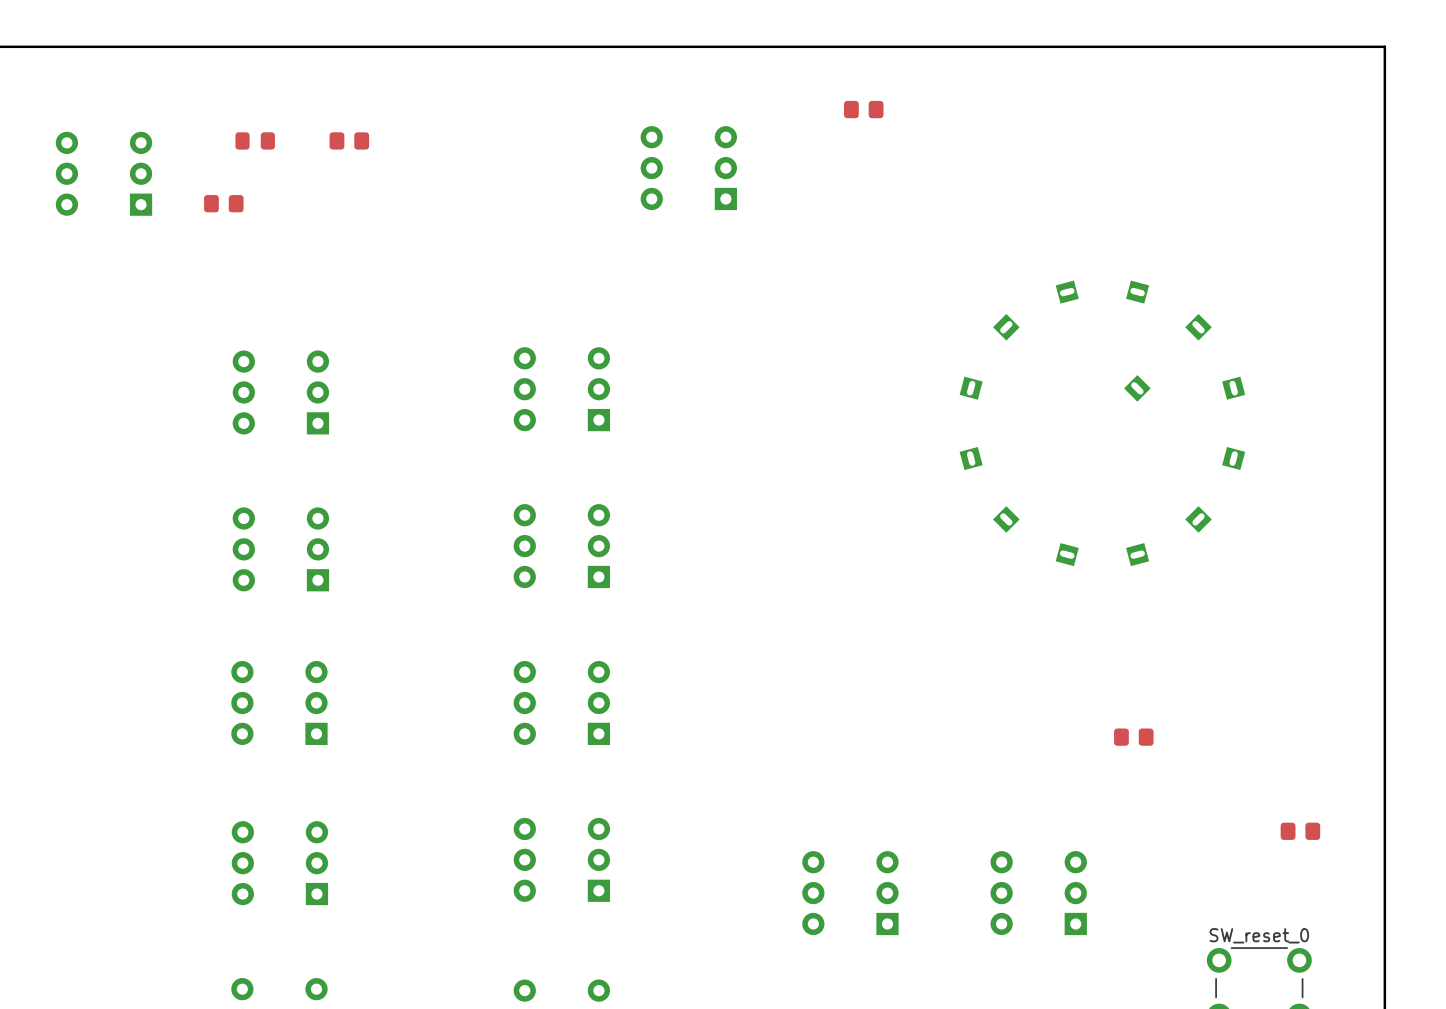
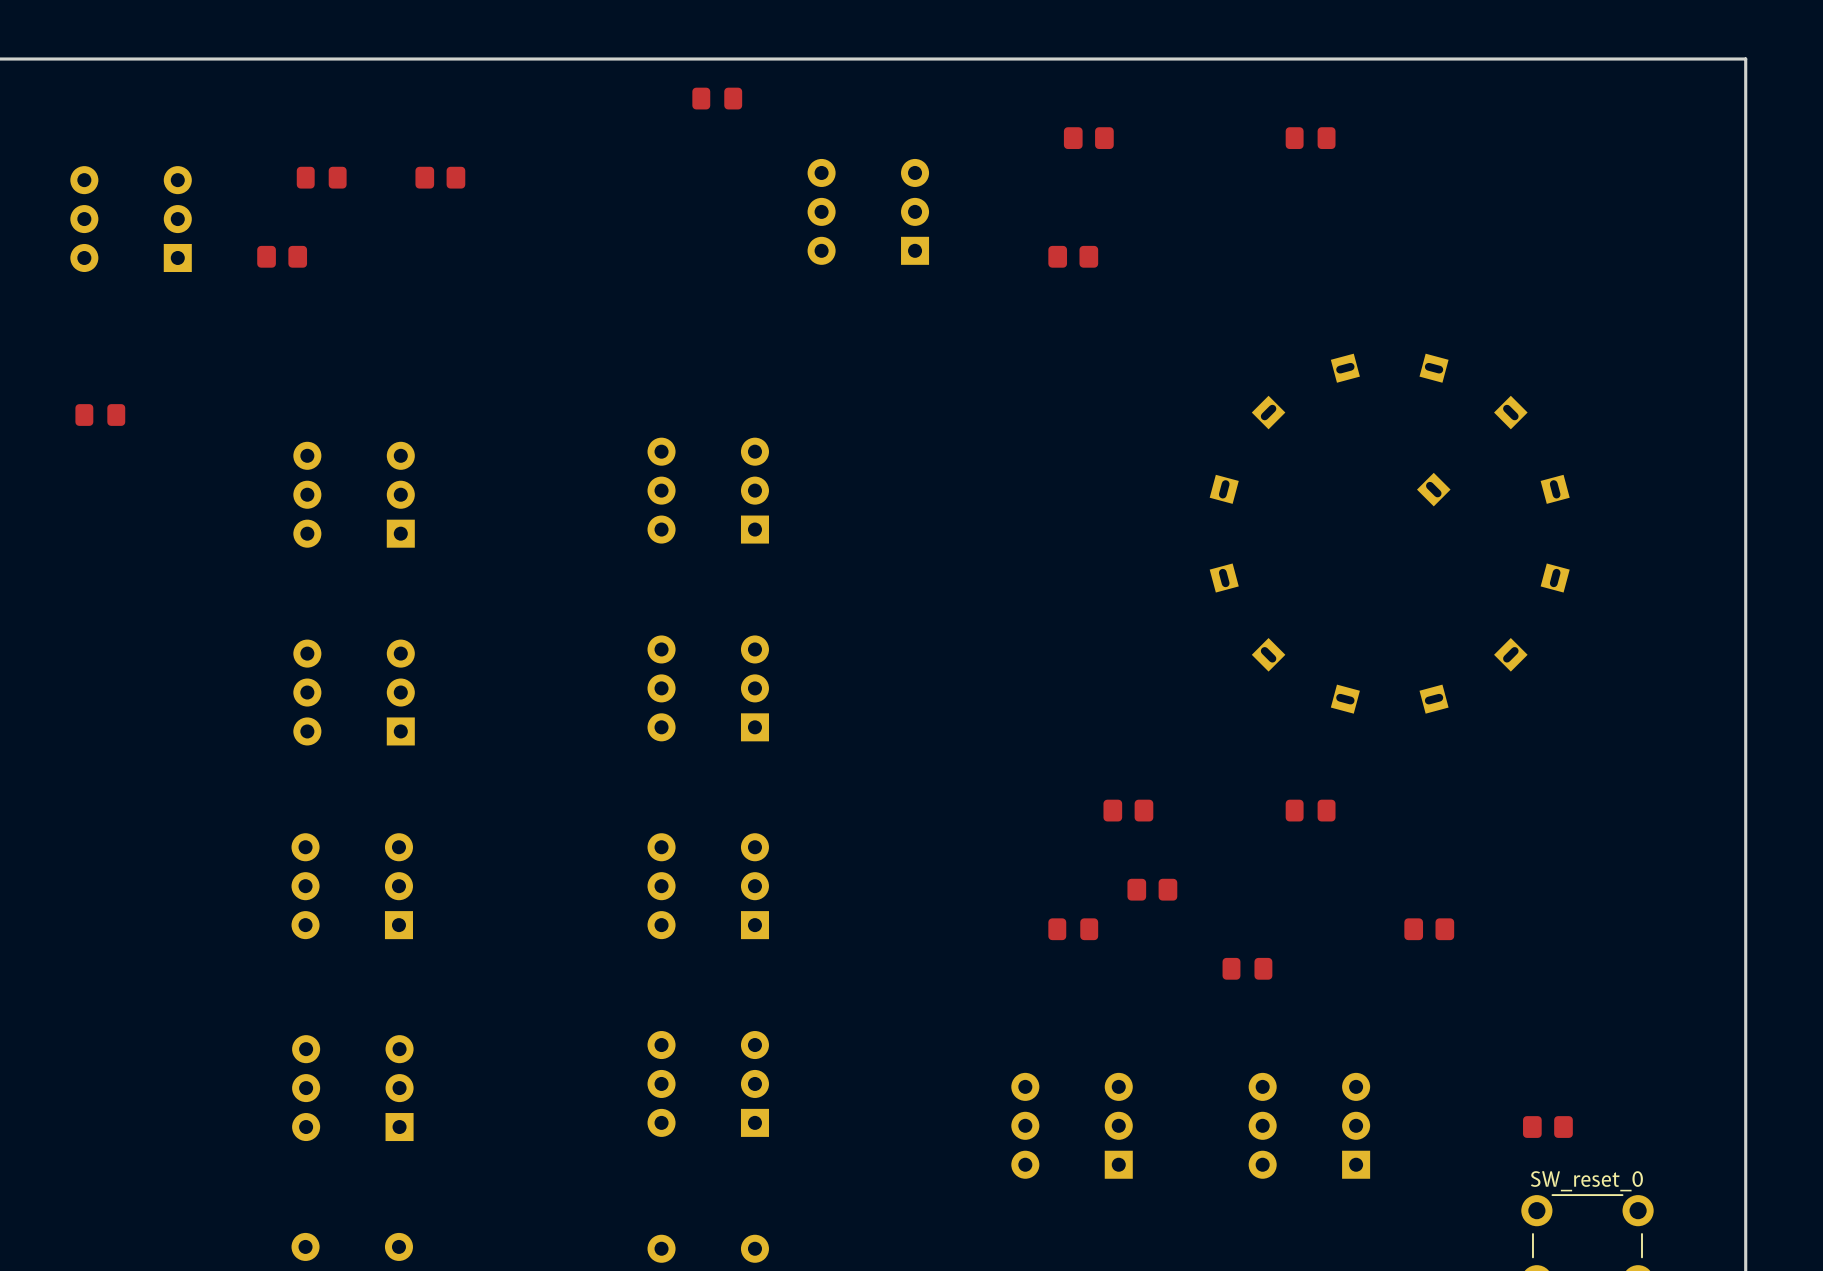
part: none -> (717, 98)
part: none -> (1310, 138)
part: none -> (1073, 256)
part: none -> (100, 415)
part: none -> (1128, 810)
part: none -> (1310, 810)
part: none -> (1152, 889)
part: none -> (1073, 929)
part: none -> (1247, 968)
part position: (1300, 831) -> (1547, 1127)

